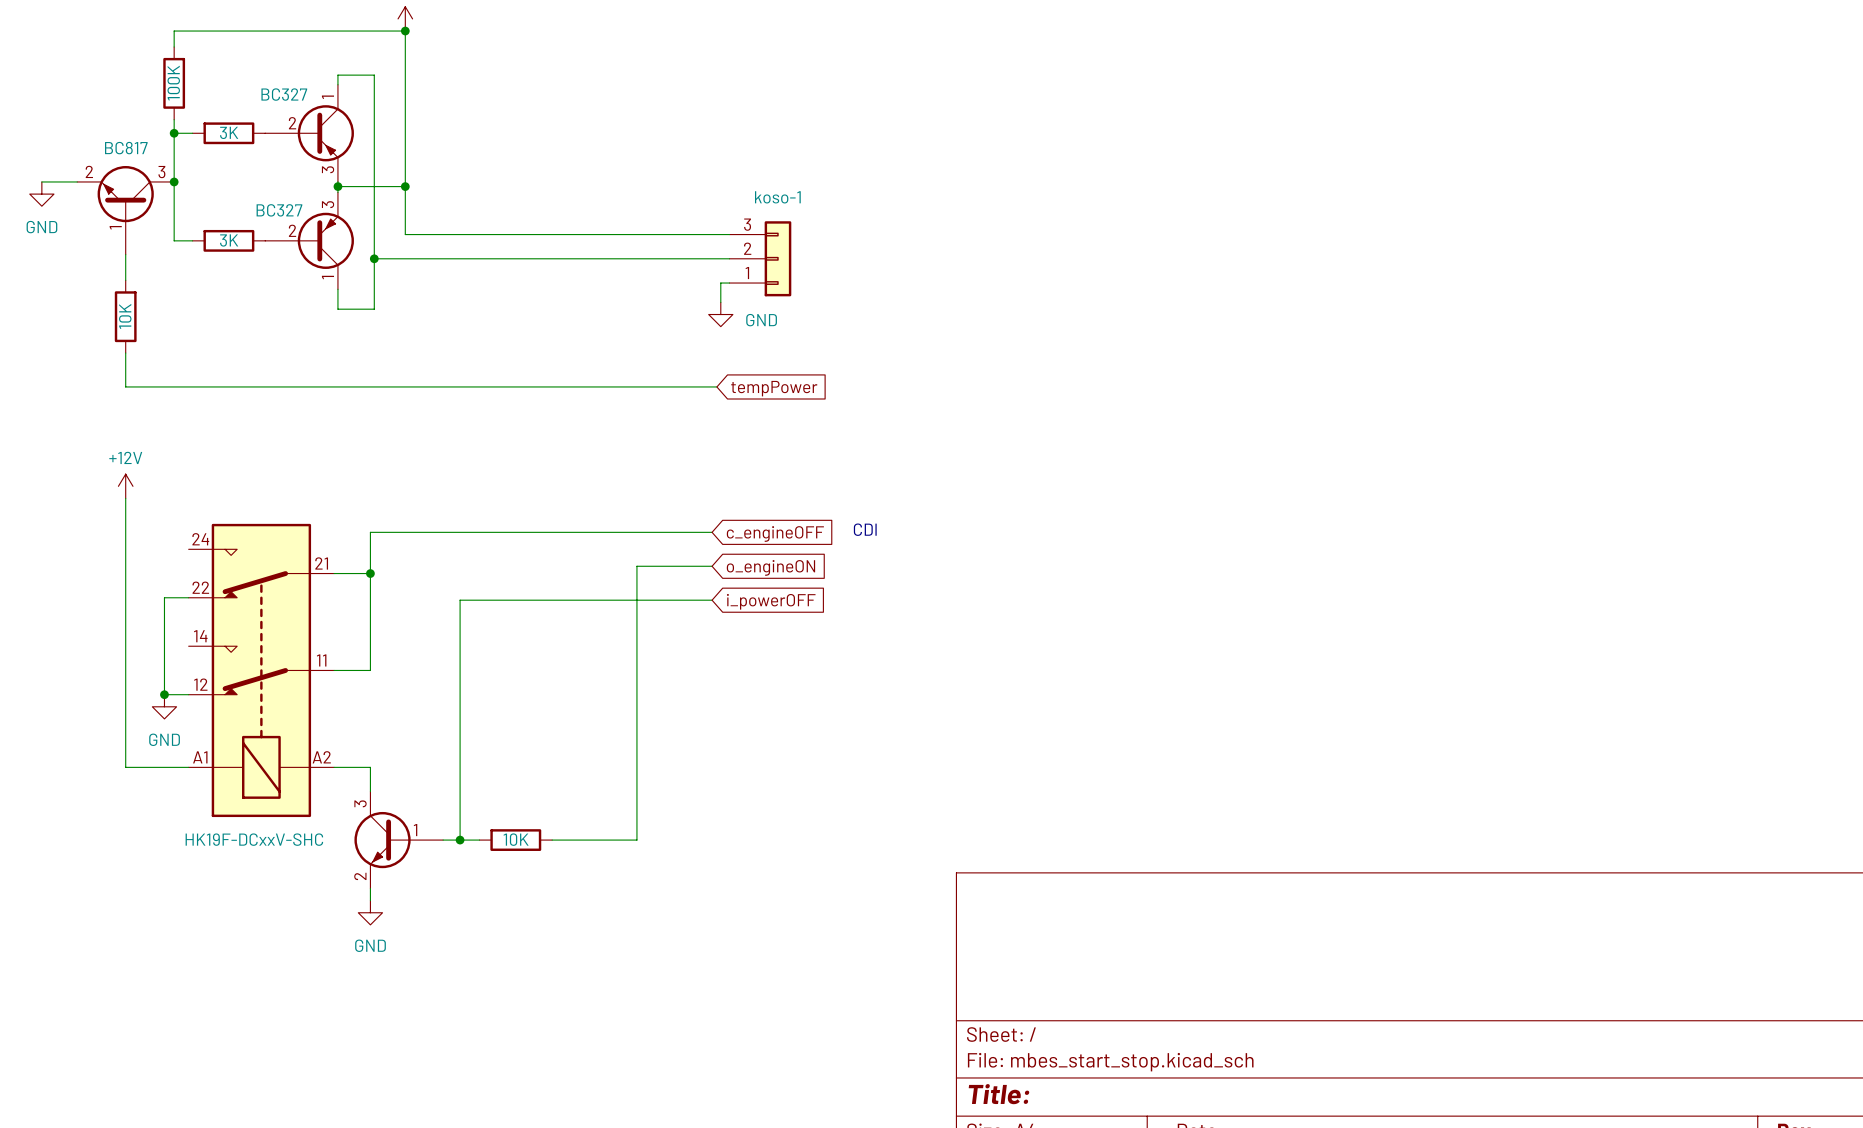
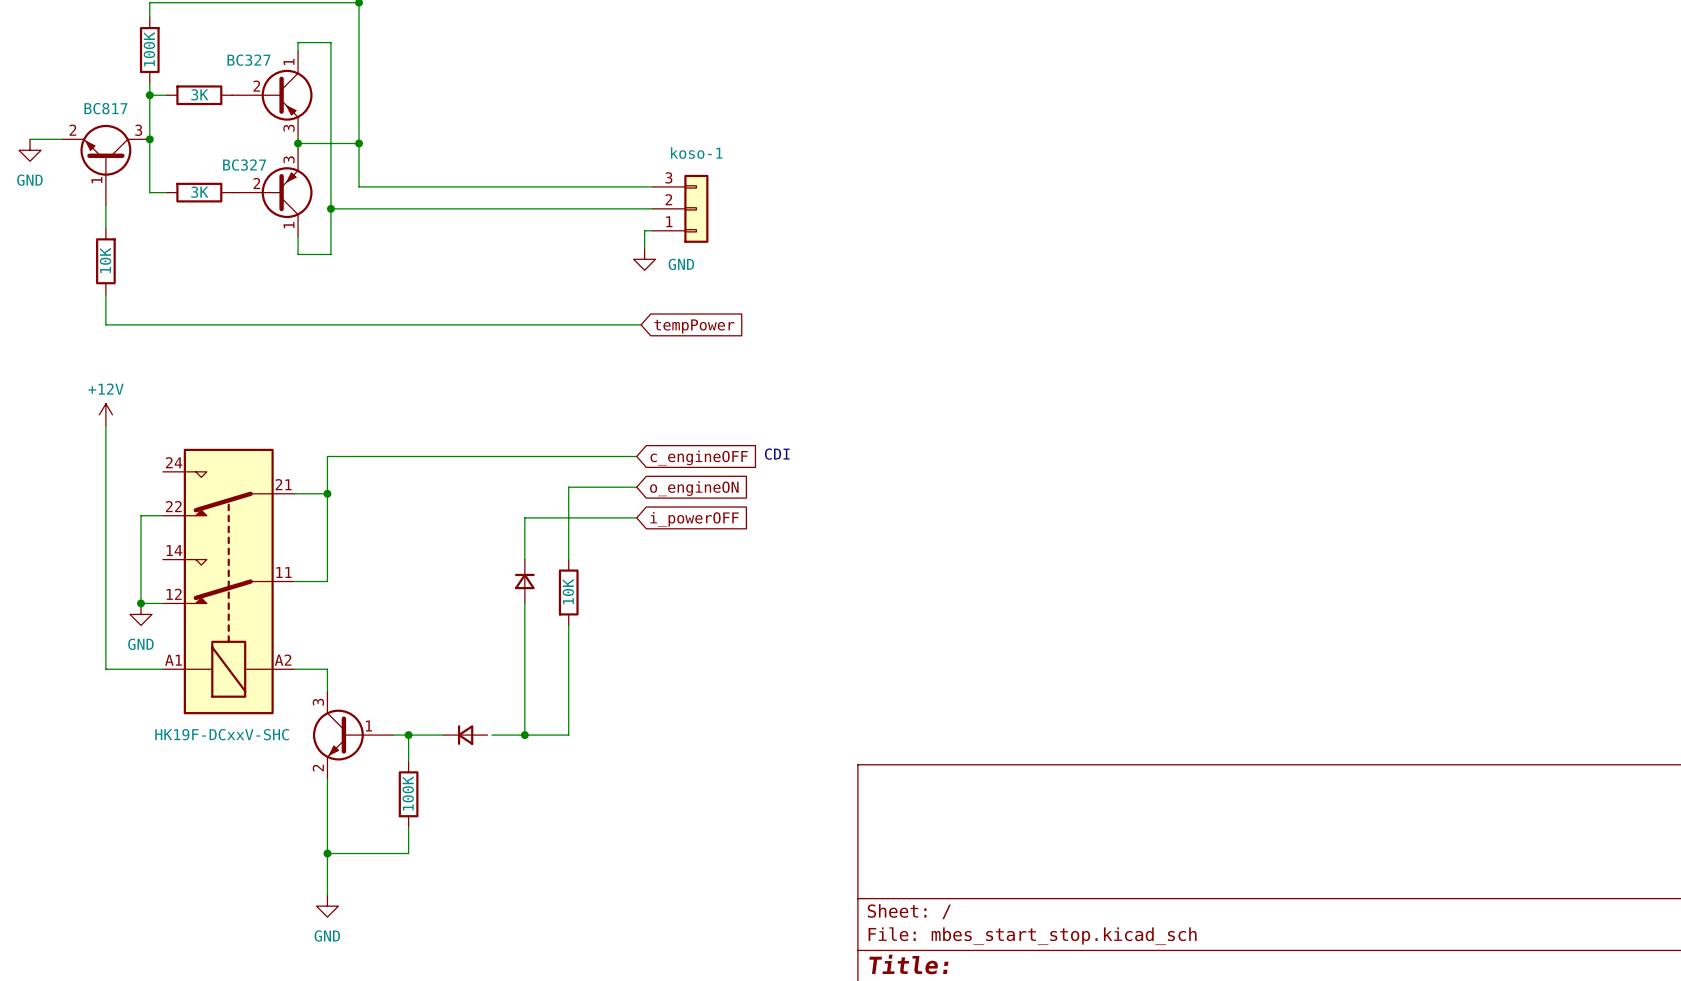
wire: (588, 600) (460, 600) (460, 840) -> (524, 517) (524, 559)
wire: (636, 646) (636, 718) -> none
part: none -> (524, 581)
part: none -> 10K (568, 592)
wire: none -> (524, 603) (524, 735)
part symbol: [479, 829, 553, 851] -> [443, 725, 488, 745]
part value: 10K (516, 839) -> none
wire: none -> (408, 735) (408, 761)
junction: none -> (524, 735)
wire: none -> (327, 789) (327, 895)
part: none -> 100K (408, 794)
power symbol position: GND (370, 912) -> GND (327, 906)
wire: none -> (408, 827) (408, 853) (327, 853)
junction: none -> (327, 853)

